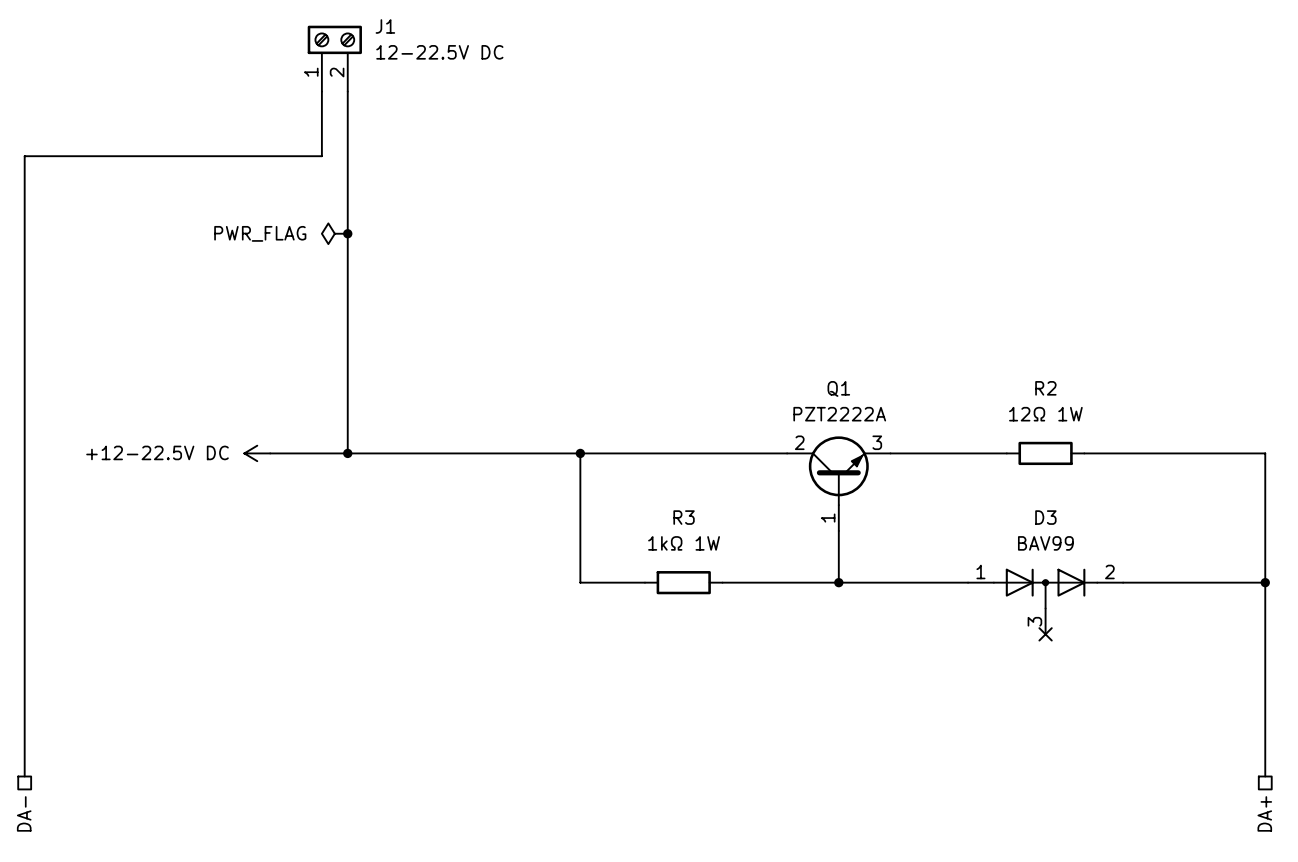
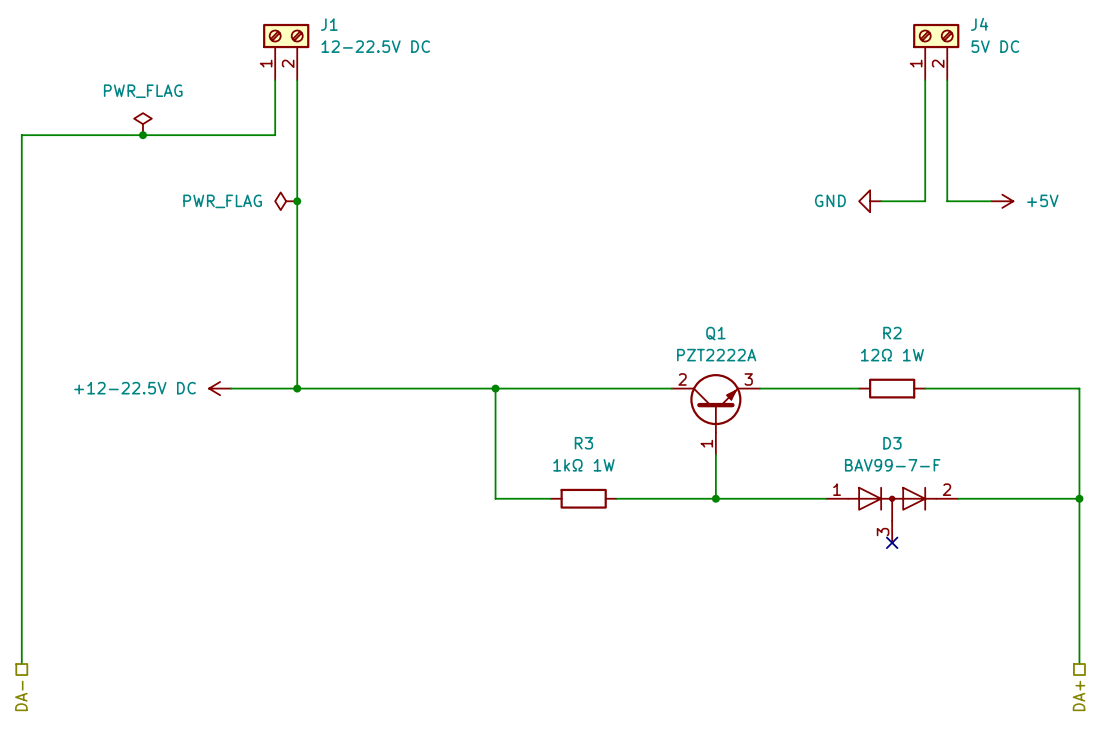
J4: none -> 5V DC (936, 51)
wire: none -> (925, 80) (925, 201) (881, 201)
wire: none -> (947, 80) (947, 201) (991, 201)
power symbol: none -> PWR_FLAG (142, 124)
junction: none -> (142, 135)
power symbol: none -> GND (870, 201)
power symbol: none -> +5V (1002, 201)
D3 value: BAV99 (1045, 543) -> BAV99-7-F (892, 465)

